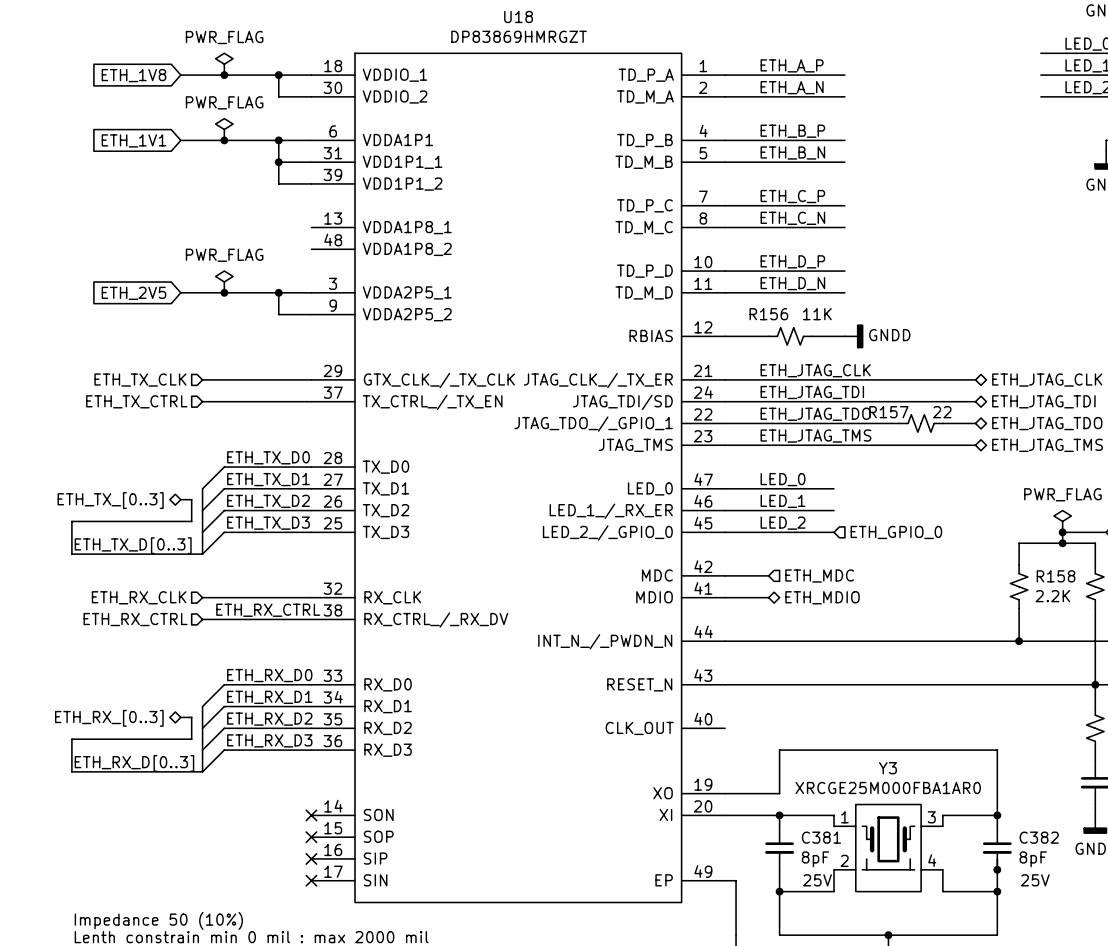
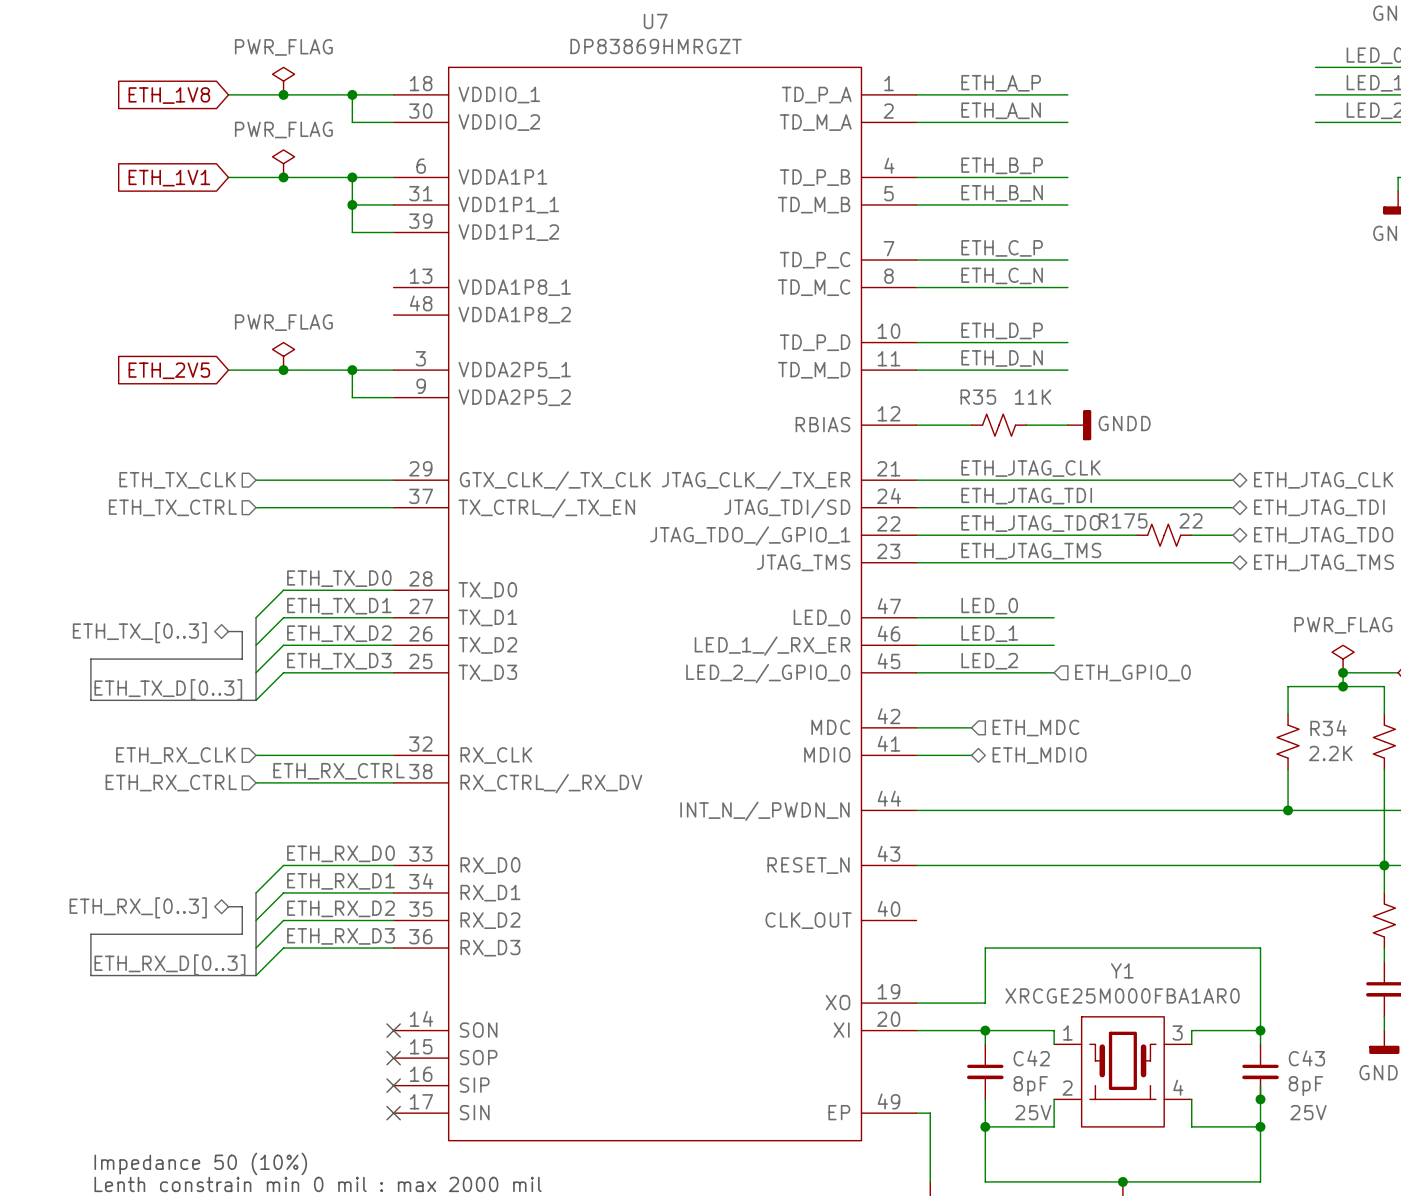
U18 name: U18 (518, 16) -> U7 (655, 21)
R156 name: R156 (768, 314) -> R35 (978, 397)
R157 name: R157 (888, 412) -> R175 (1123, 520)
R158 name: R158 (1056, 576) -> R34 (1328, 728)
Y3 name: Y3 (887, 768) -> Y1 (1122, 970)
C381 name: C381 (821, 837) -> C42 (1031, 1058)
C382 name: C382 (1039, 837) -> C43 (1306, 1058)

